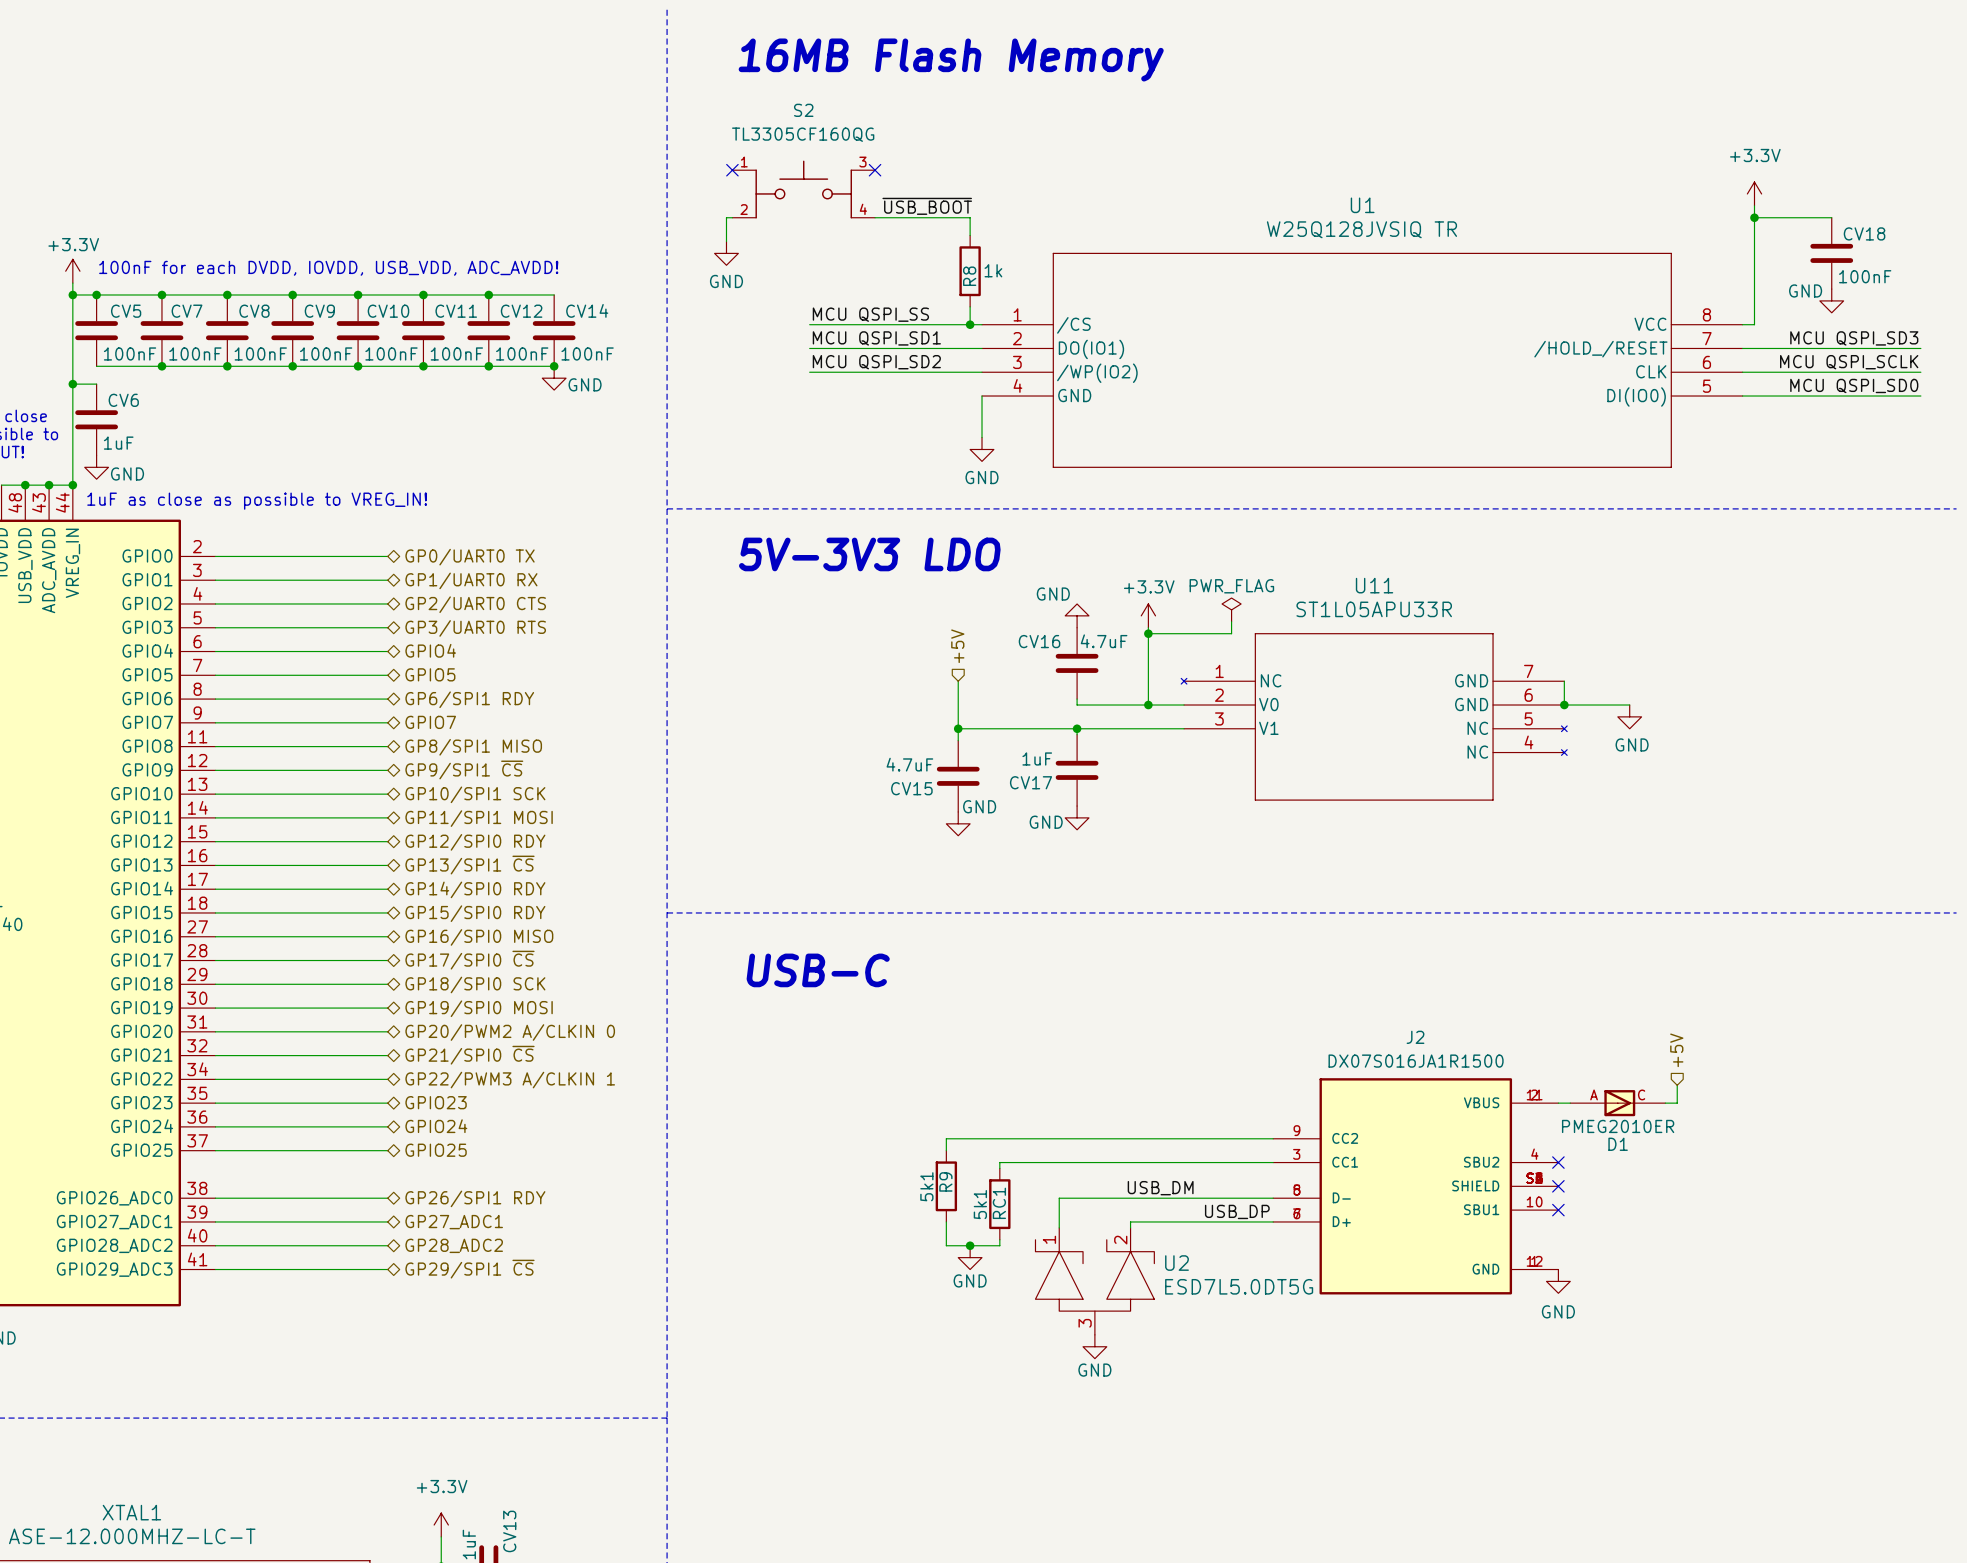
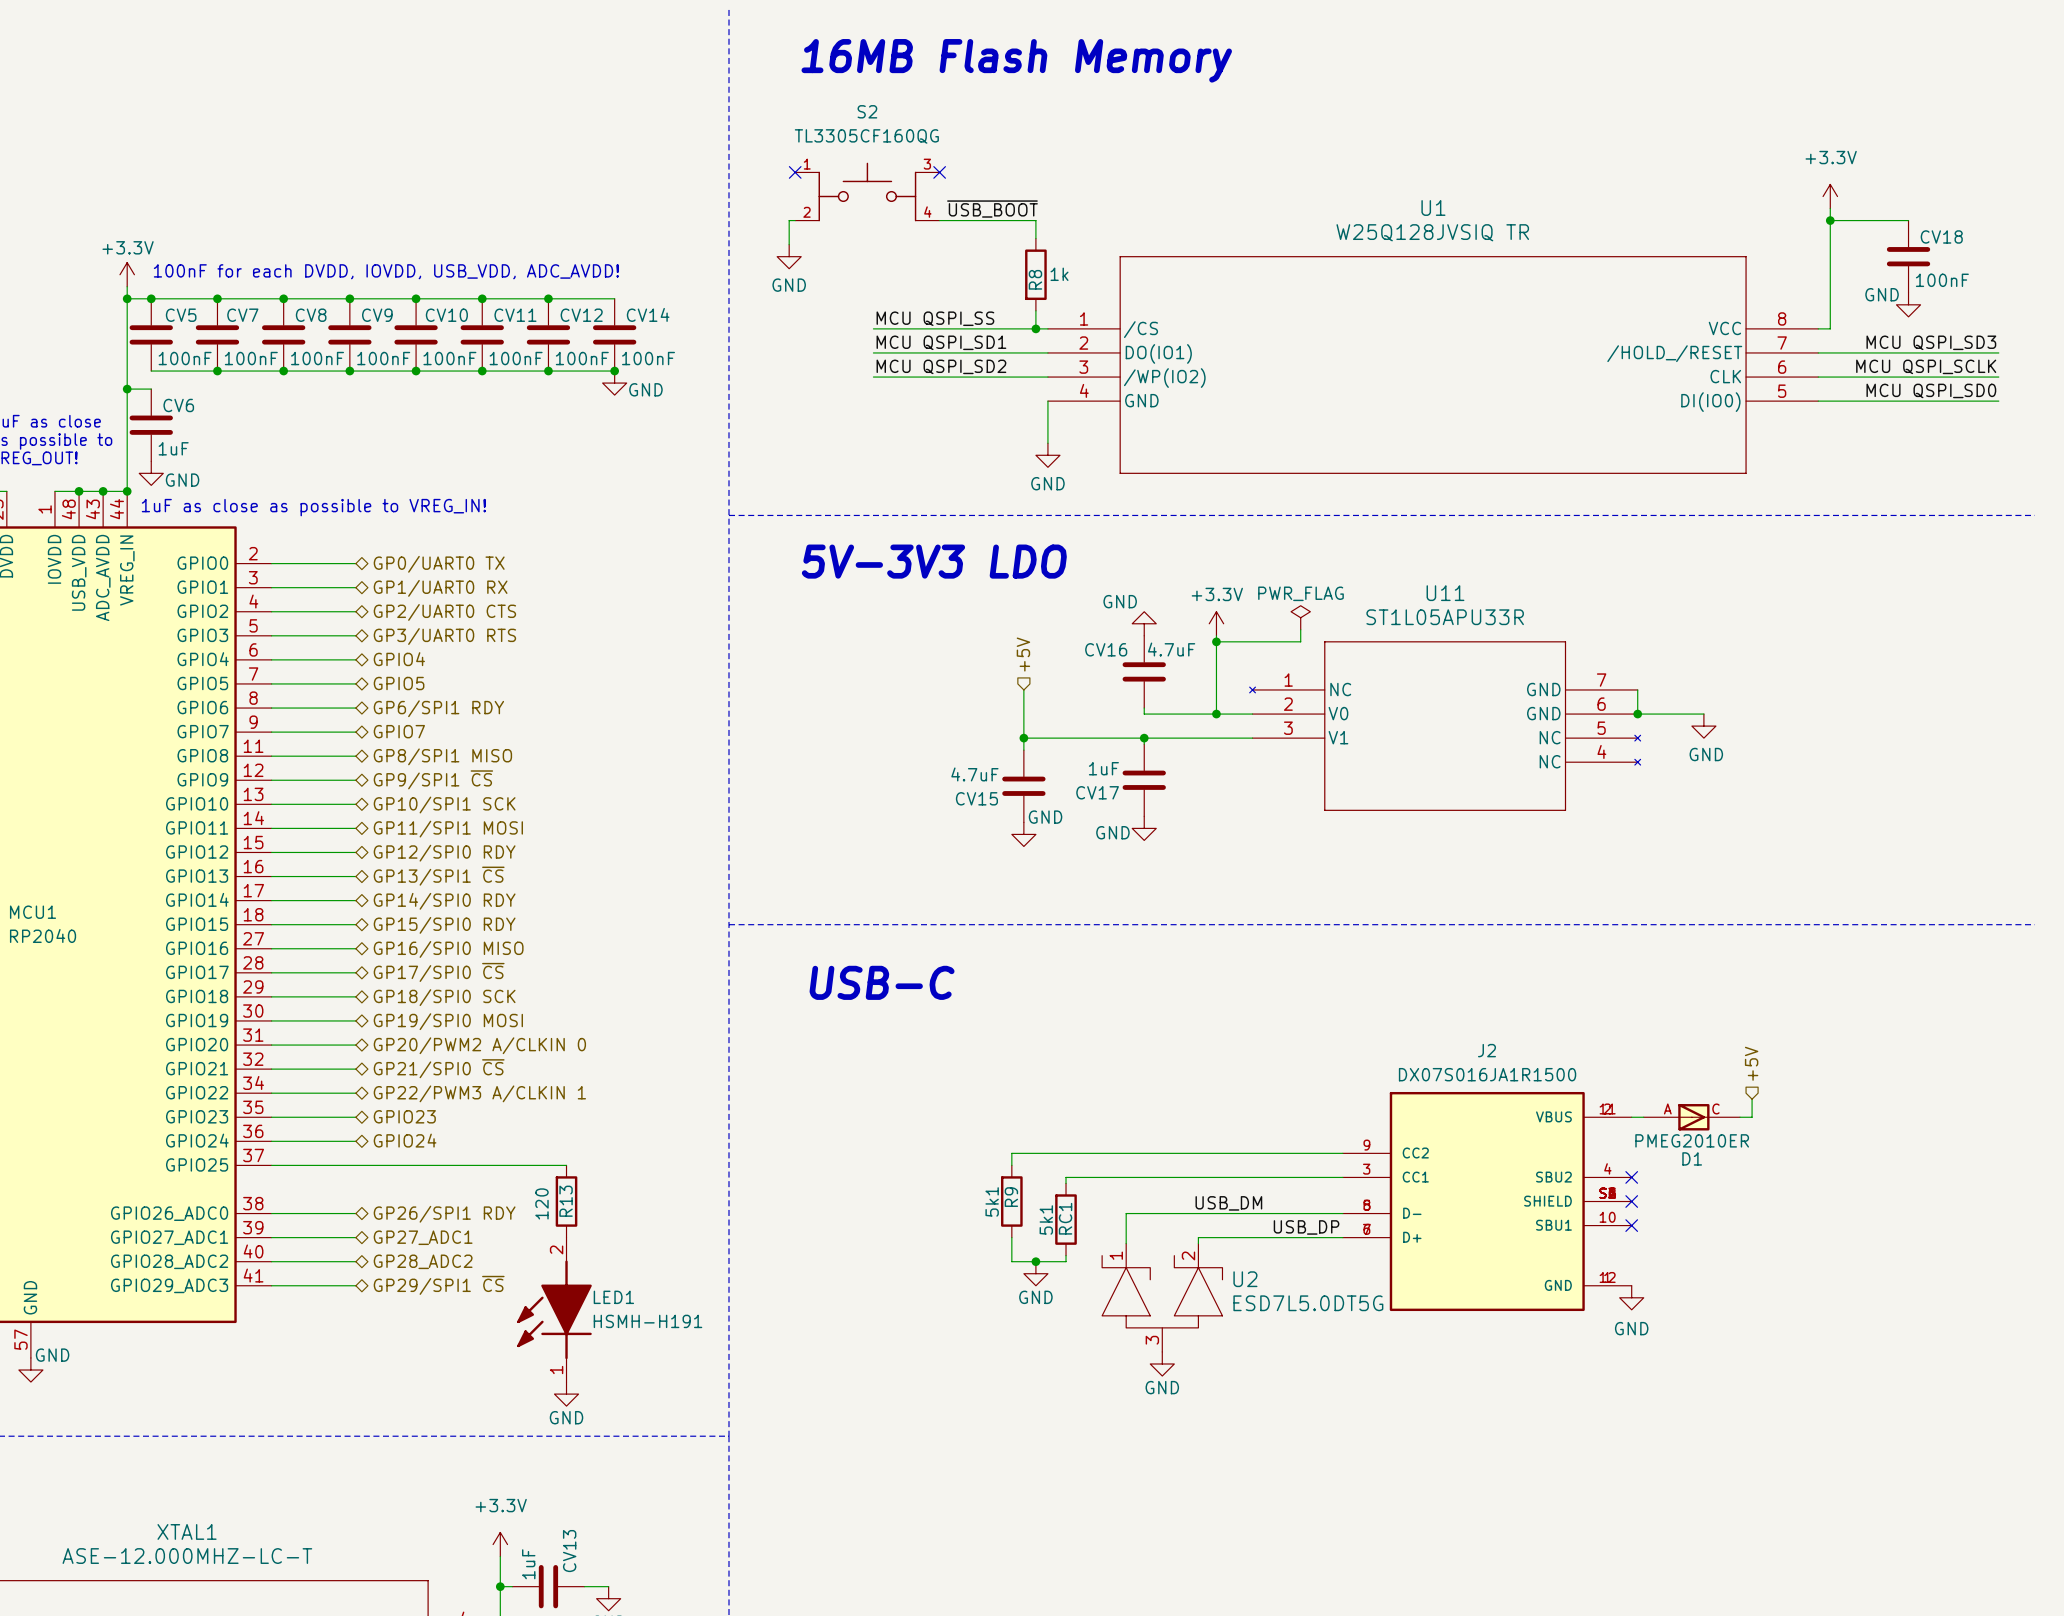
wire: (298, 556) (387, 556) -> none
hierarchical label position: GP0/UART0 TX (470, 557) -> GP0/UART0 TX (439, 564)
wire: (298, 580) (387, 580) -> none
hierarchical label position: GP1/UART0 RX (471, 580) -> GP1/UART0 RX (440, 588)
wire: (298, 603) (387, 603) -> none
hierarchical label position: GP2/UART0 CTS (475, 604) -> GP2/UART0 CTS (444, 612)
wire: (298, 627) (387, 627) -> none
hierarchical label position: GP3/UART0 RTS (475, 628) -> GP3/UART0 RTS (444, 636)
hierarchical label position: GPIO4 (430, 650) -> GPIO4 (399, 659)
wire: (298, 651) (387, 651) -> none
hierarchical label position: GPIO5 (430, 674) -> GPIO5 (399, 683)
wire: (298, 675) (387, 675) -> none
wire: (298, 699) (387, 699) -> none
hierarchical label position: GP6/SPI1 RDY (469, 699) -> GP6/SPI1 RDY (438, 708)
wire: (298, 722) (387, 722) -> none
hierarchical label position: GPIO7 (430, 722) -> GPIO7 (399, 731)
wire: (298, 746) (387, 746) -> none
hierarchical label position: GP8/SPI1 MISO (473, 747) -> GP8/SPI1 MISO (442, 756)
hierarchical label position: GP9/SPI1 ~{CS} (464, 769) -> GP9/SPI1 ~{CS} (433, 779)
wire: (298, 770) (387, 770) -> none
wire: (298, 794) (387, 794) -> none
hierarchical label position: GP10/SPI1 SCK (475, 794) -> GP10/SPI1 SCK (444, 805)
wire: (298, 817) (387, 817) -> none
hierarchical label position: GP11/SPI1 MOSI (479, 818) -> GP11/SPI1 MOSI (448, 829)
wire: (298, 841) (387, 841) -> none
hierarchical label position: GP12/SPI0 RDY (475, 842) -> GP12/SPI0 RDY (444, 853)
wire: (298, 865) (387, 865) -> none
hierarchical label position: GP13/SPI1 ~{CS} (469, 865) -> GP13/SPI1 ~{CS} (439, 876)
wire: (298, 889) (387, 889) -> none
hierarchical label position: GP14/SPI0 RDY (475, 889) -> GP14/SPI0 RDY (444, 901)
wire: (298, 912) (387, 912) -> none
hierarchical label position: GP15/SPI0 RDY (475, 913) -> GP15/SPI0 RDY (444, 925)
wire: (298, 936) (387, 936) -> none
hierarchical label position: GP16/SPI0 MISO (479, 937) -> GP16/SPI0 MISO (448, 949)
wire: (298, 960) (387, 960) -> none
hierarchical label position: GP17/SPI0 ~{CS} (469, 960) -> GP17/SPI0 ~{CS} (439, 972)
wire: (298, 984) (387, 984) -> none
hierarchical label position: GP18/SPI0 SCK (475, 984) -> GP18/SPI0 SCK (444, 997)
wire: (298, 1008) (387, 1008) -> none
hierarchical label position: GP19/SPI0 MOSI (479, 1008) -> GP19/SPI0 MOSI (448, 1021)
wire: (298, 1031) (387, 1031) -> none
hierarchical label position: GP20/PWM2 A/CLKIN 0 (510, 1032) -> GP20/PWM2 A/CLKIN 0 (479, 1045)
wire: (298, 1055) (387, 1055) -> none
hierarchical label position: GP21/SPI0 ~{CS} (469, 1055) -> GP21/SPI0 ~{CS} (439, 1068)
wire: (298, 1079) (387, 1079) -> none
hierarchical label position: GP22/PWM3 A/CLKIN 1 (510, 1080) -> GP22/PWM3 A/CLKIN 1 (479, 1093)
hierarchical label position: GPIO23 (436, 1102) -> GPIO23 (404, 1116)
wire: (298, 1103) (387, 1103) -> none
wire: (298, 1126) (387, 1126) -> none
hierarchical label position: GPIO24 (436, 1126) -> GPIO24 (405, 1140)
wire: none -> (446, 1165) (566, 1165)
hierarchical label: GPIO25 (436, 1150) -> none
R13: none -> 120 (566, 1201)
wire: (298, 1198) (387, 1198) -> none
hierarchical label position: GP26/SPI1 RDY (475, 1198) -> GP26/SPI1 RDY (444, 1214)
wire: (298, 1221) (387, 1221) -> none
hierarchical label position: GP27_ADC1 (454, 1222) -> GP27_ADC1 (423, 1237)
wire: (298, 1245) (387, 1245) -> none
hierarchical label position: GP28_ADC2 (454, 1245) -> GP28_ADC2 (423, 1261)
wire: (298, 1269) (387, 1269) -> none
hierarchical label position: GP29/SPI1 ~{CS} (469, 1269) -> GP29/SPI1 ~{CS} (439, 1285)
LED1: none -> HSMH-H191 (554, 1309)
power symbol: none -> GND (566, 1394)

